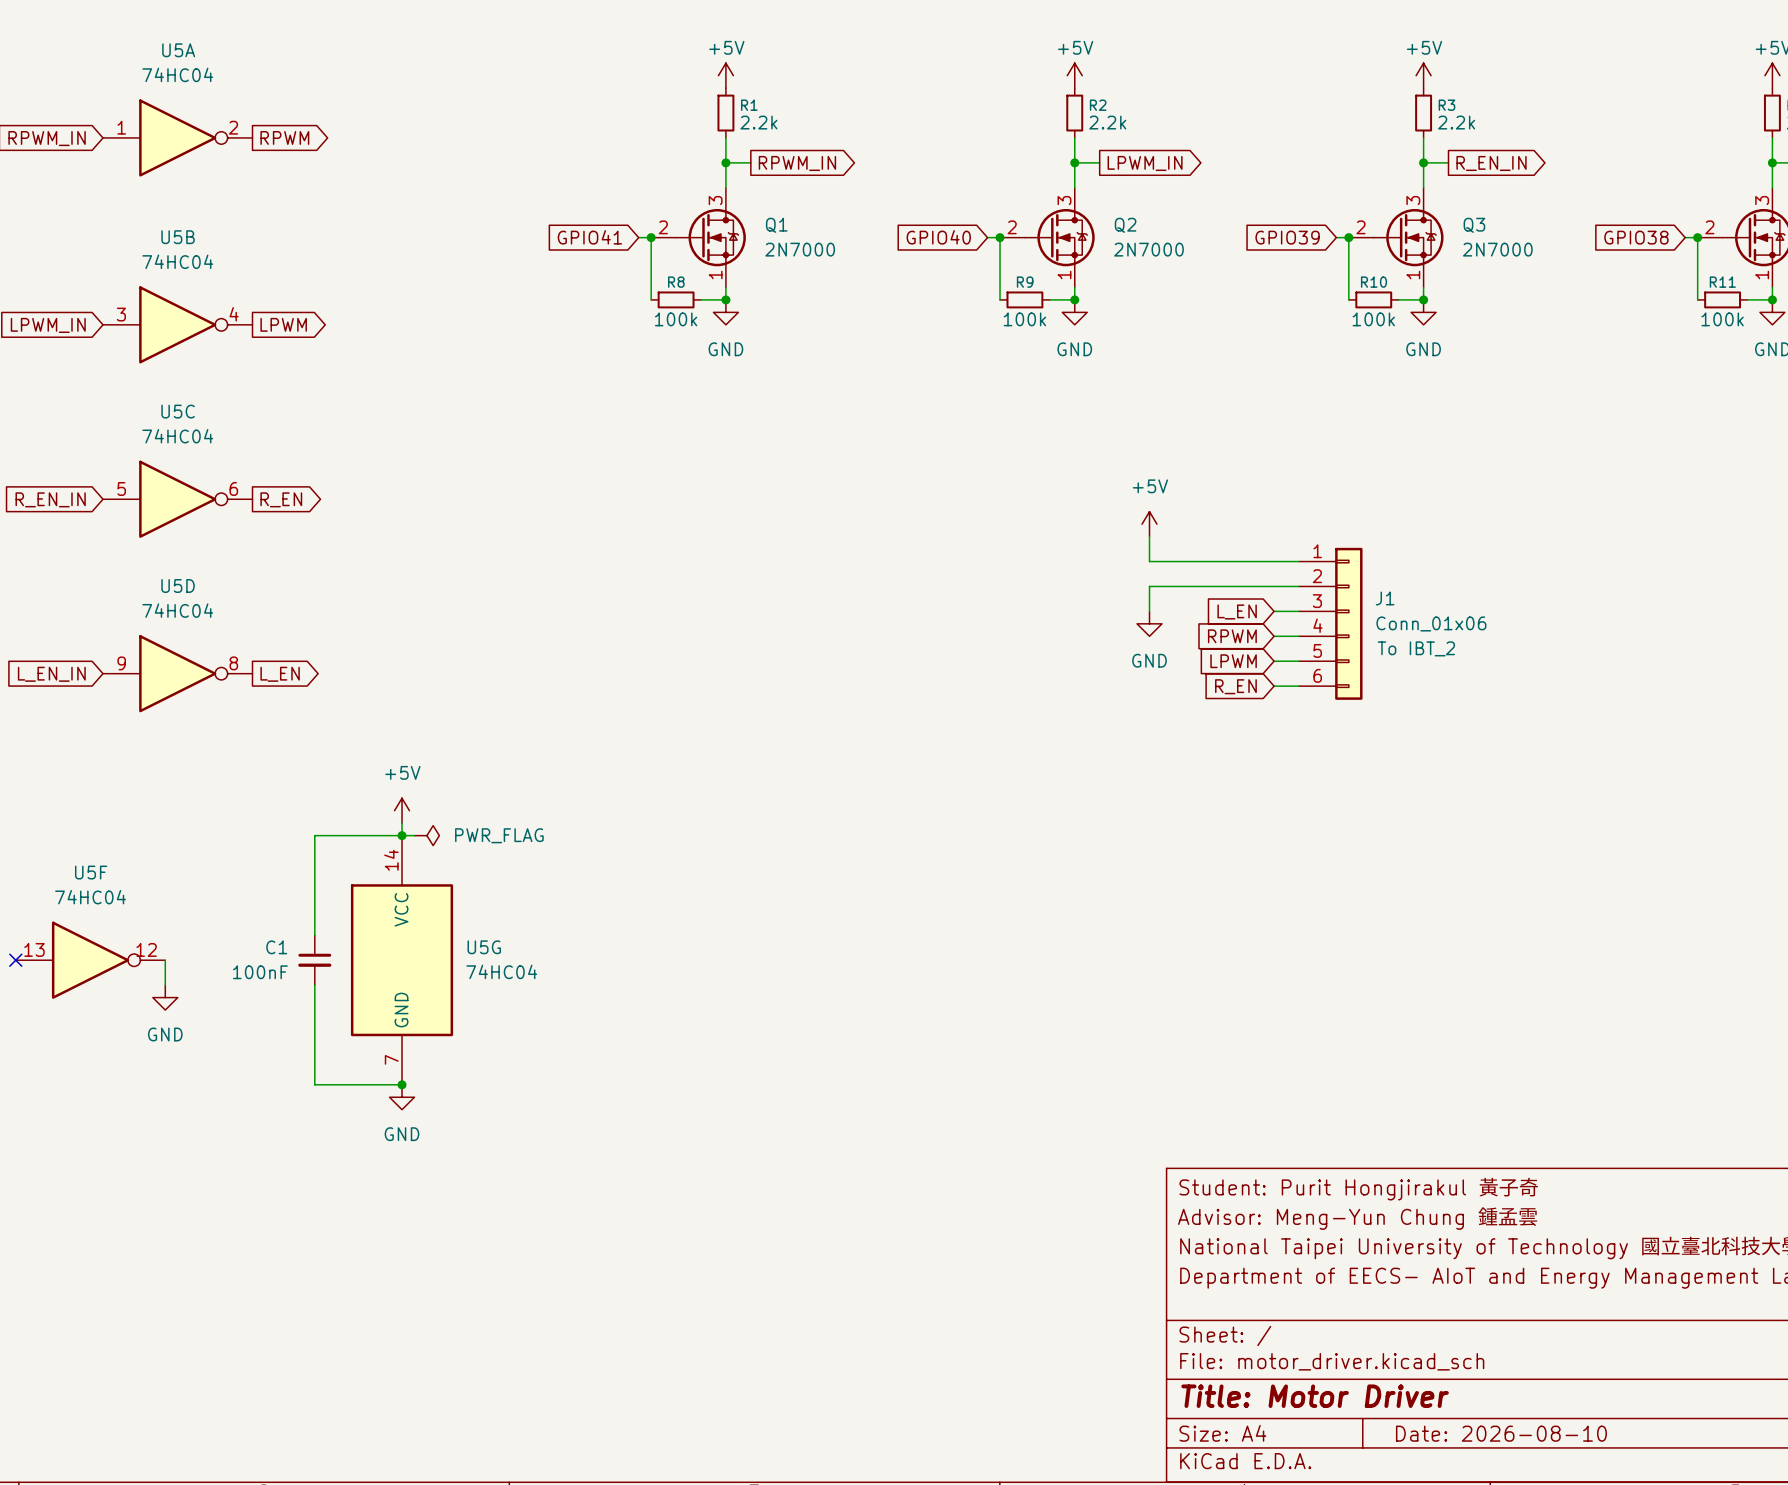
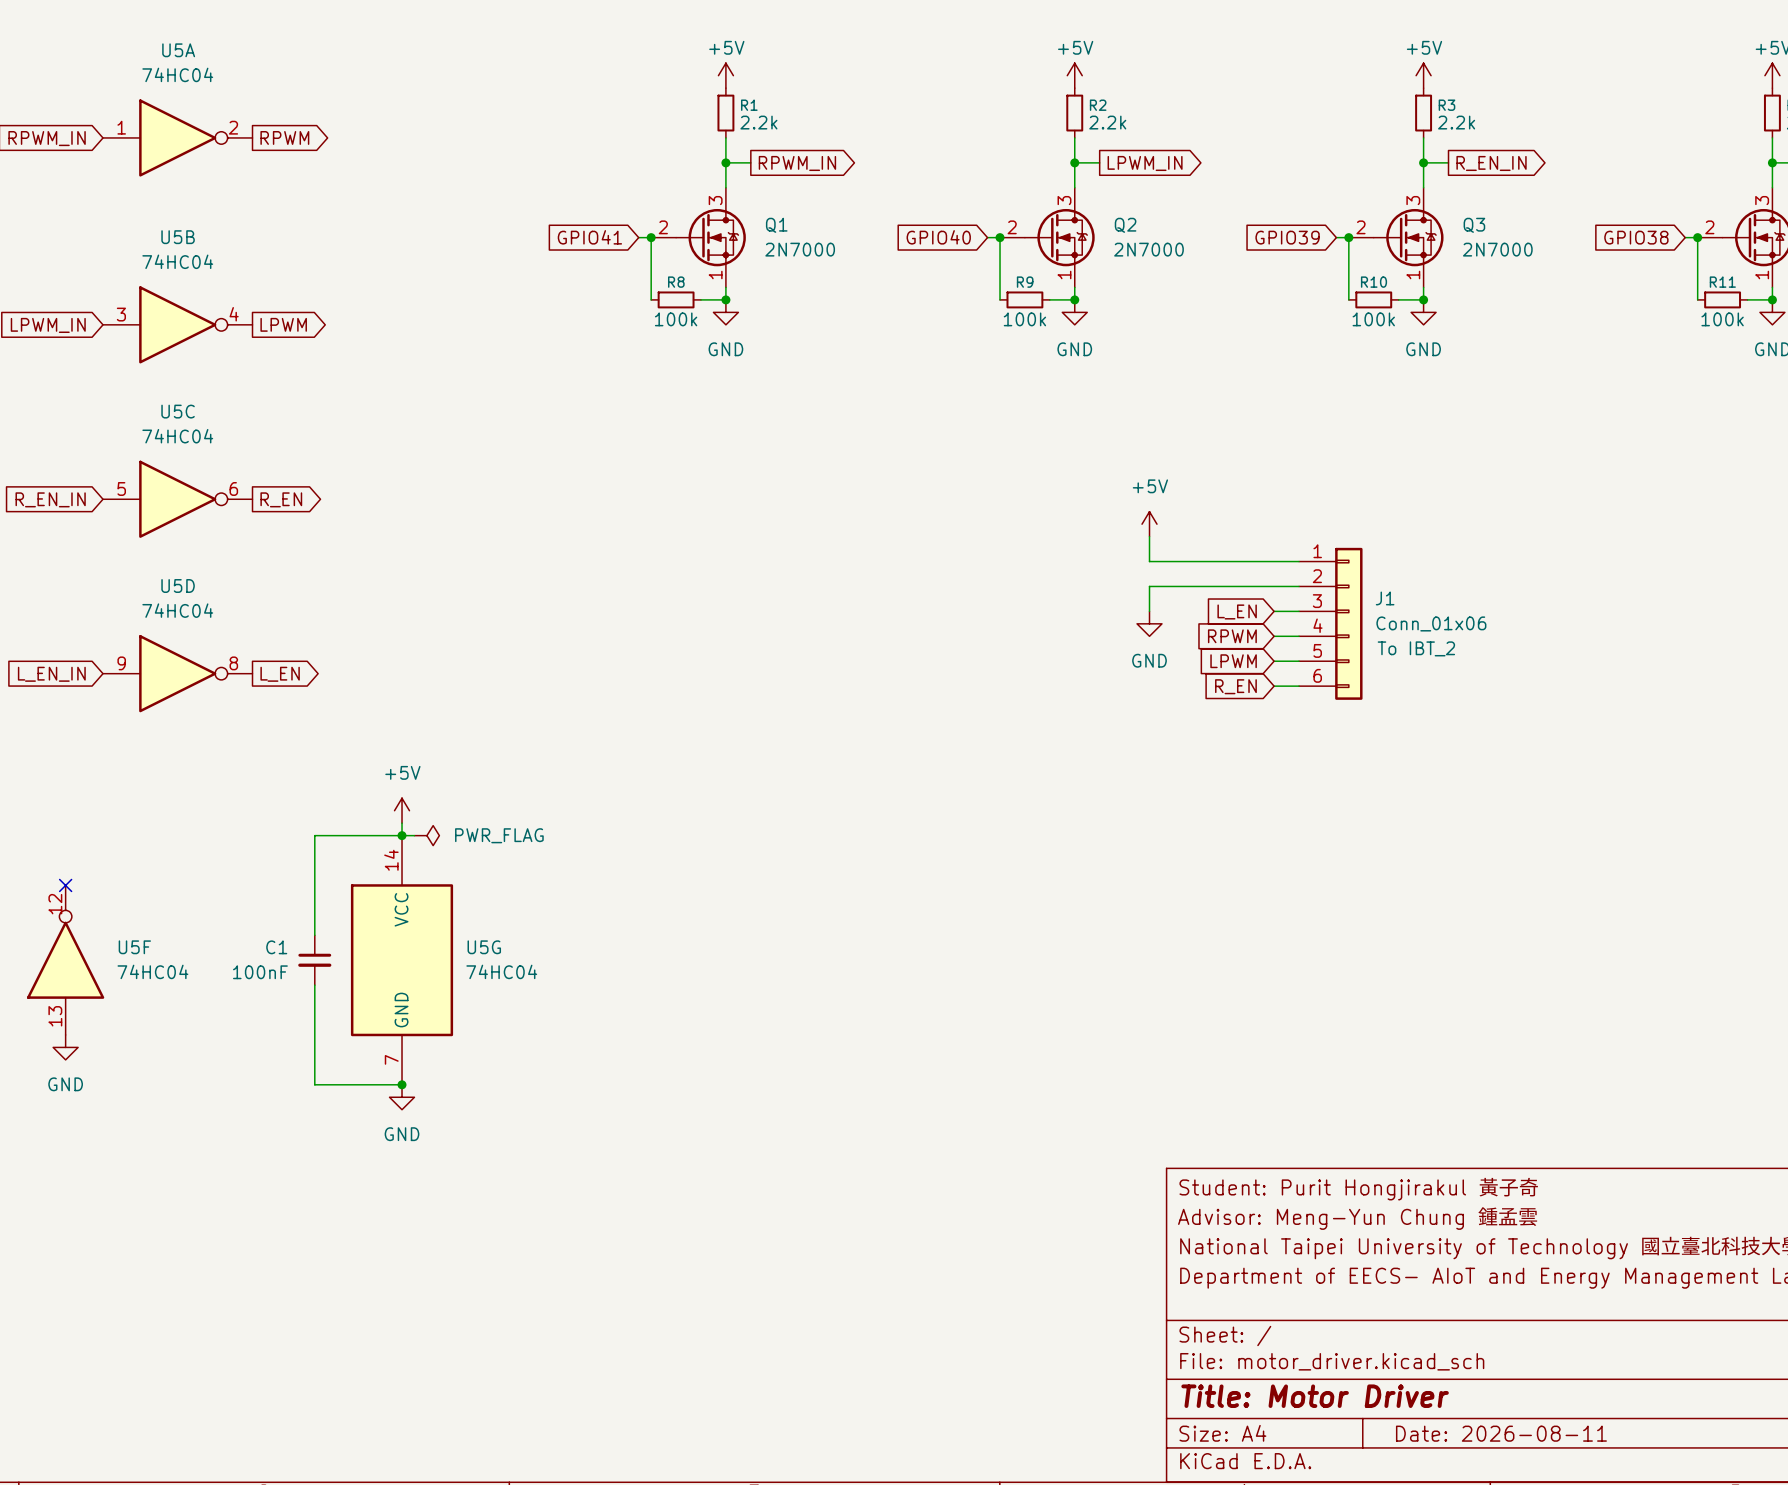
U5F name position: U5F (91, 872) -> U5F (134, 947)
no-connect mark: none -> (65, 885)
U5F value position: 74HC04 (90, 897) -> 74HC04 (152, 971)
no-connect mark: (15, 960) -> none
U5F rotation: 0° (90, 960) -> 90° counterclockwise (65, 960)
wire: (165, 960) (165, 985) -> none
power symbol position: GND (165, 997) -> GND (65, 1047)
title block: Date: 2026-08-10 (1501, 1433) -> Date: 2026-08-11 (1501, 1433)

